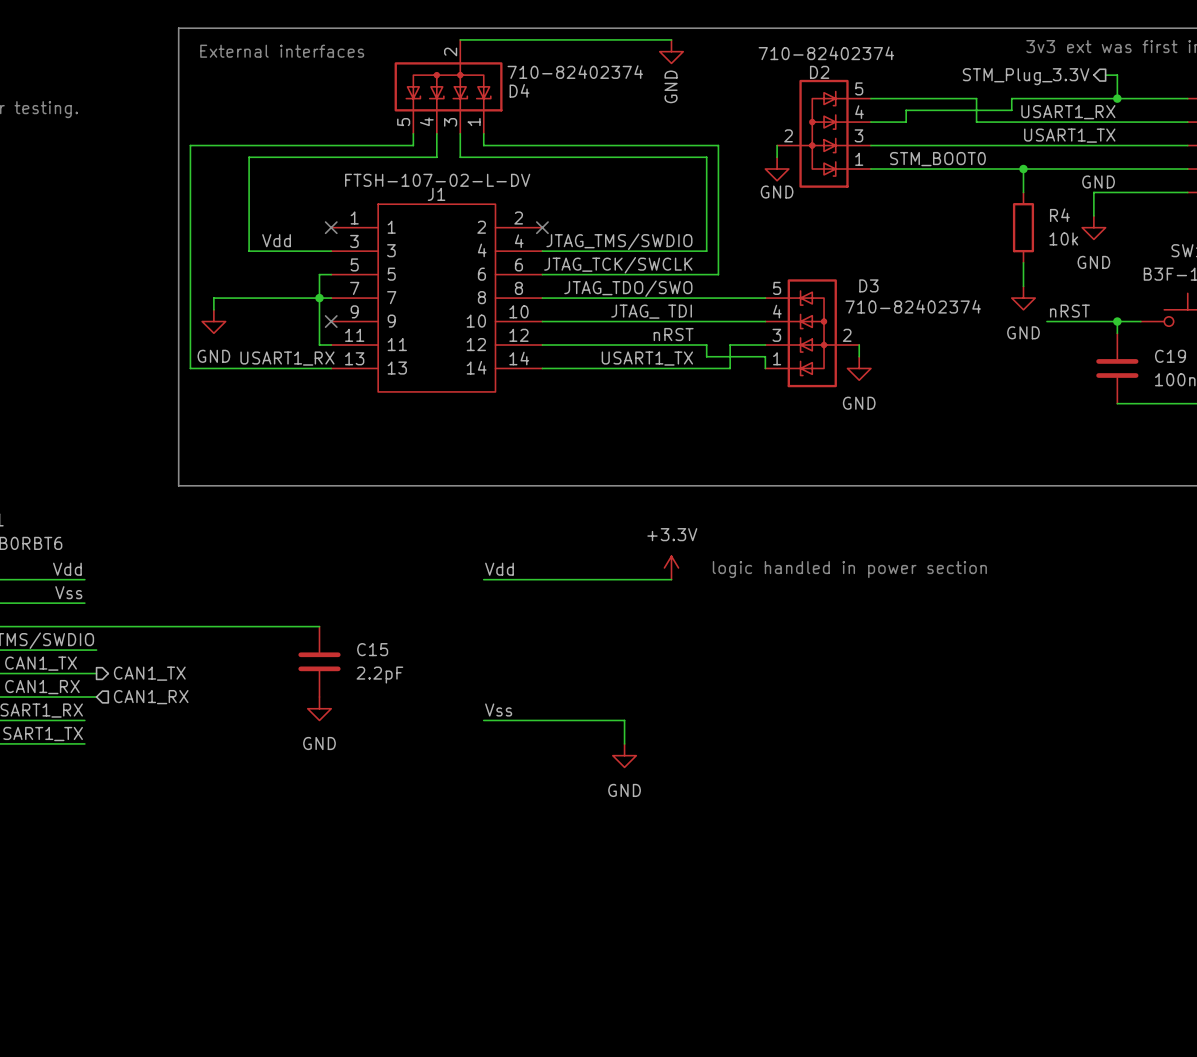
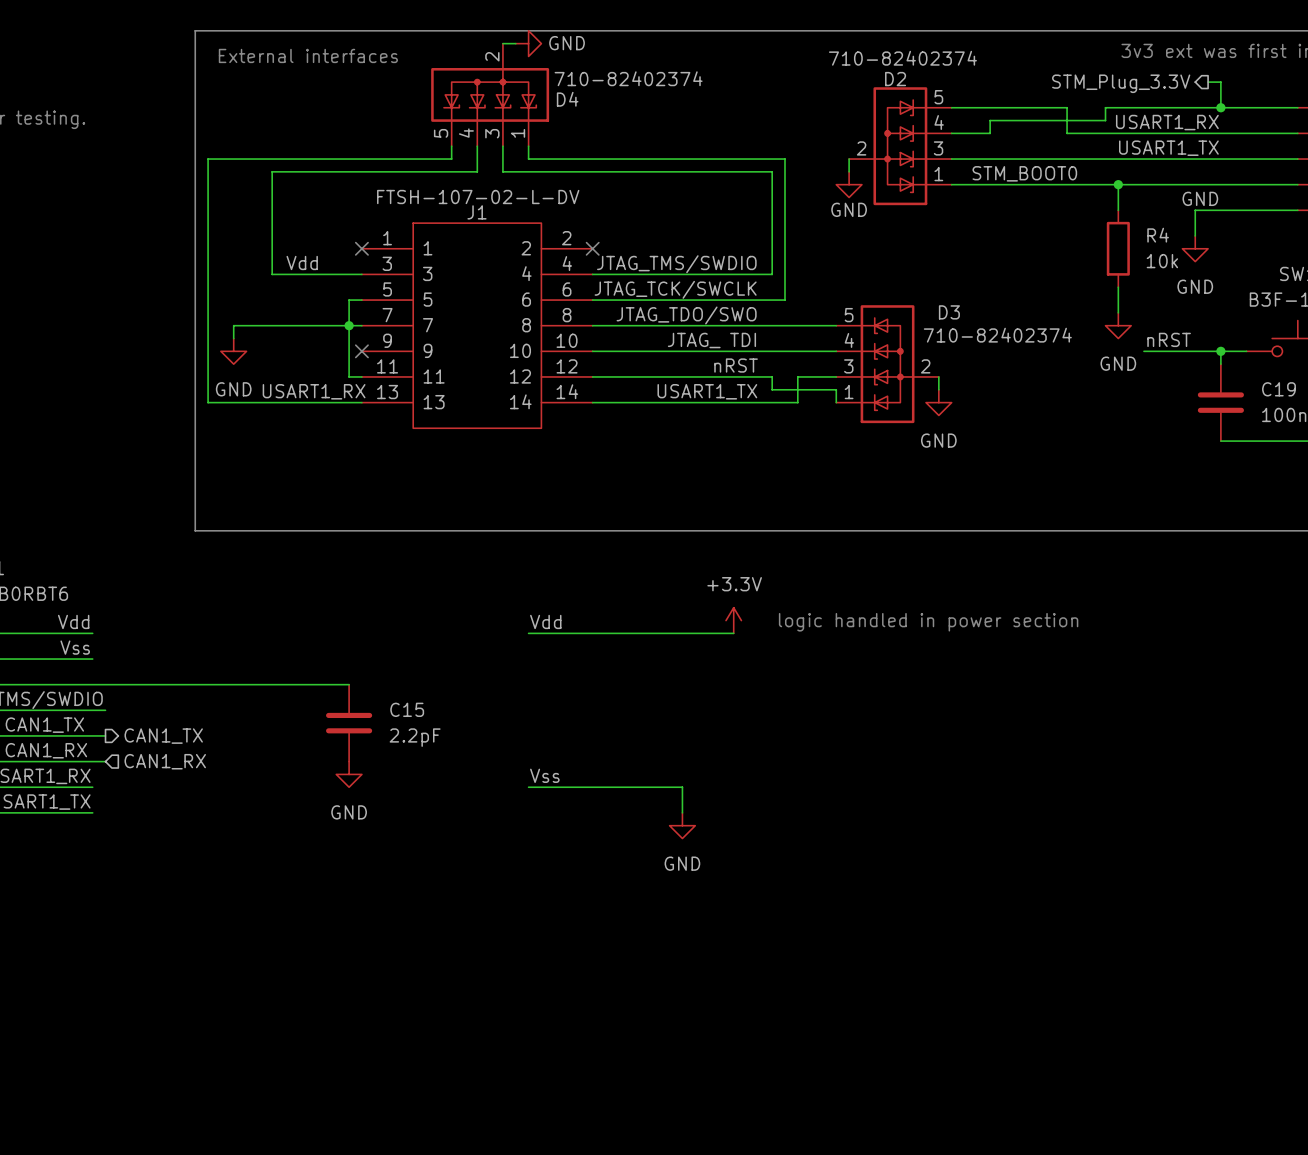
wire: (472, 39) (671, 39) -> none
power symbol rotation: 0° (671, 51) -> 90° counterclockwise (528, 43)
power symbol position: GND (671, 51) -> GND (528, 43)

